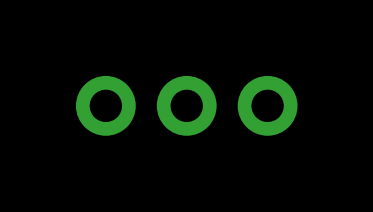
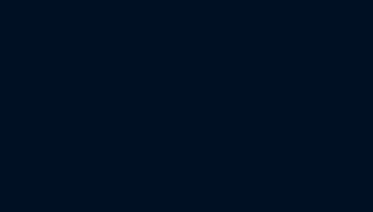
part: (186, 105) -> none

